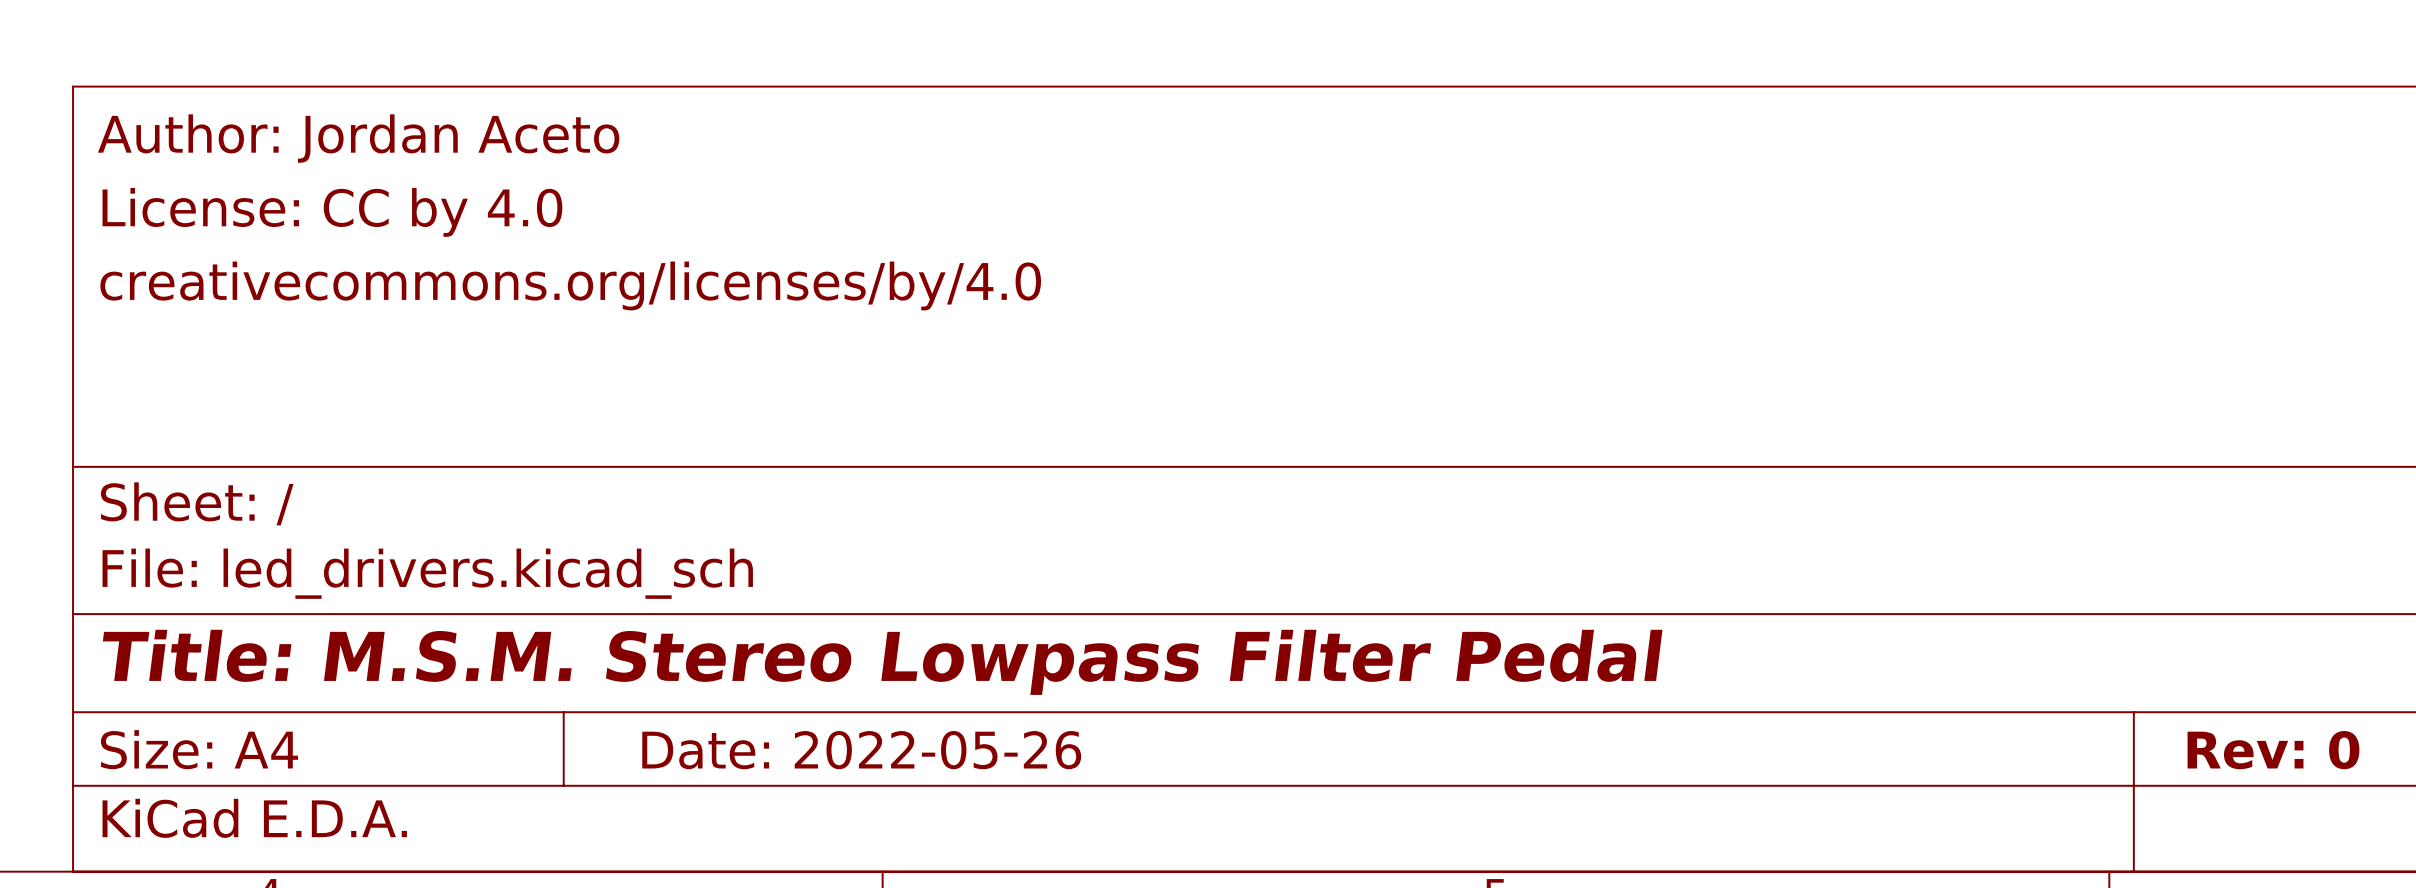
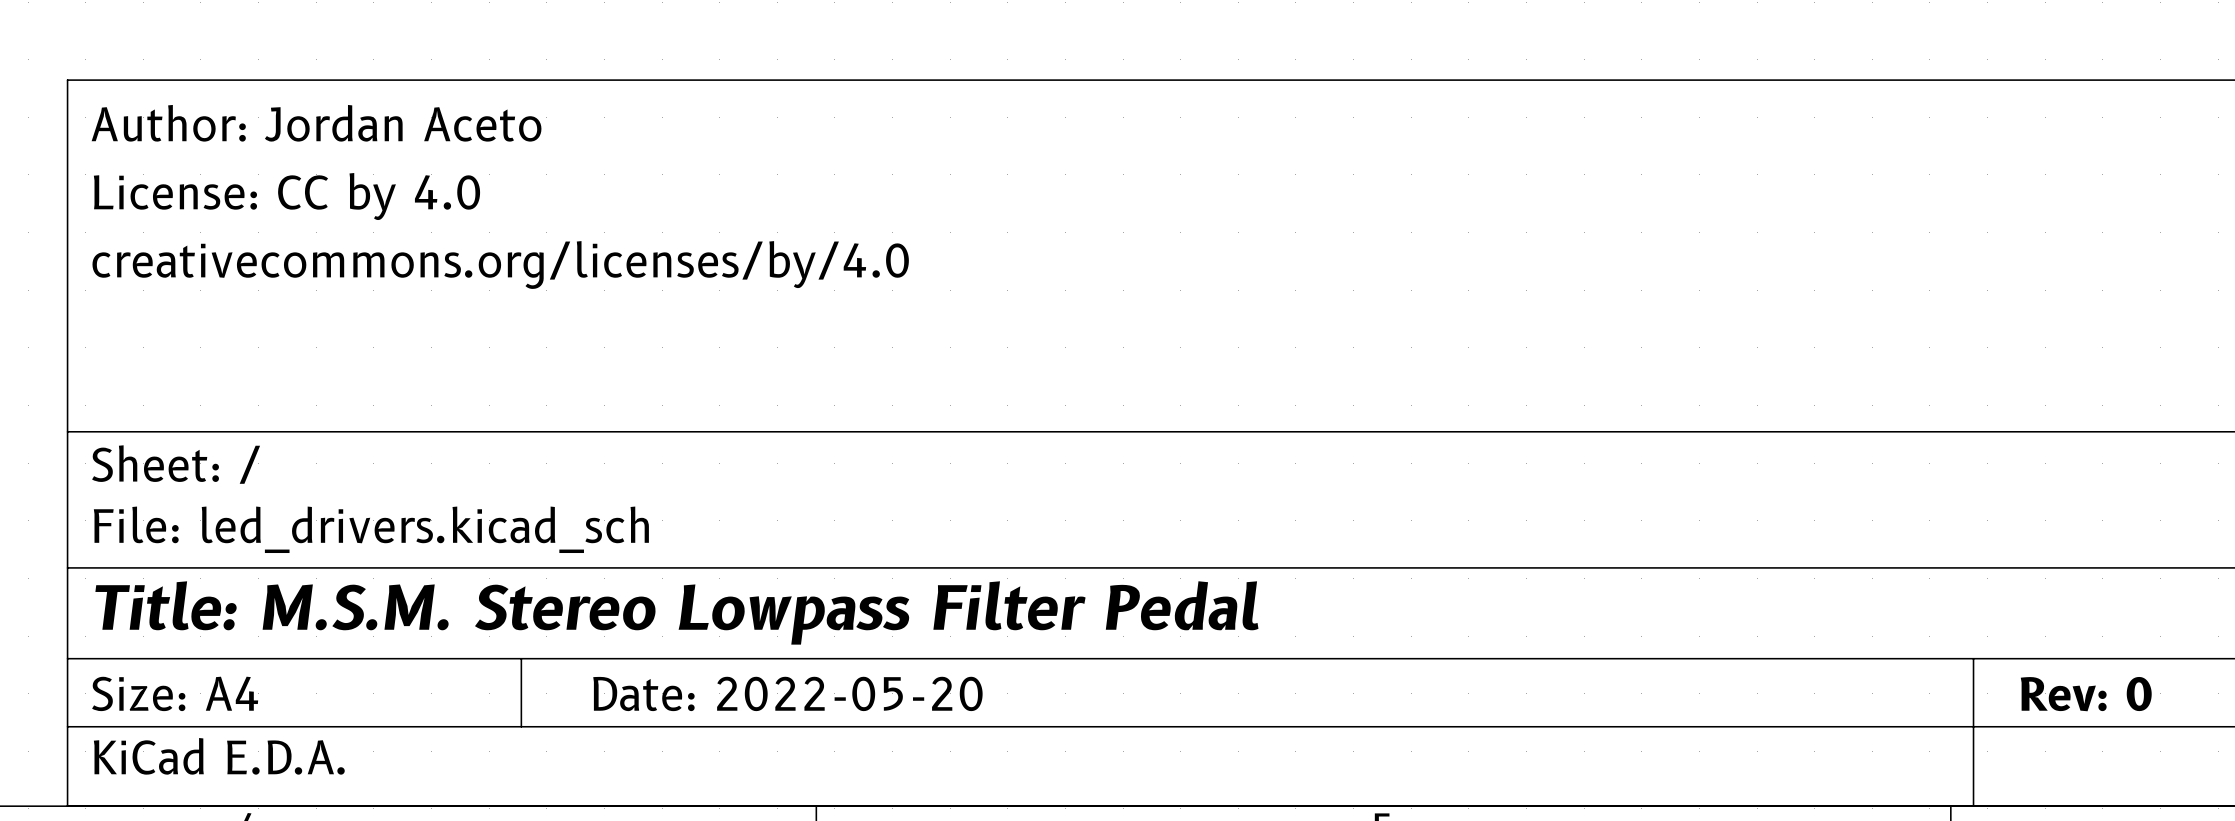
title block: Date: 2022-05-26 (861, 750) -> Date: 2022-05-20 (787, 693)

